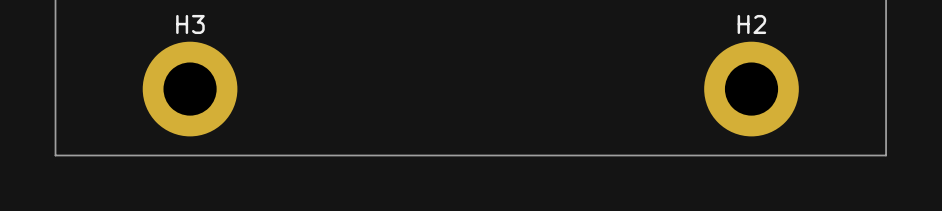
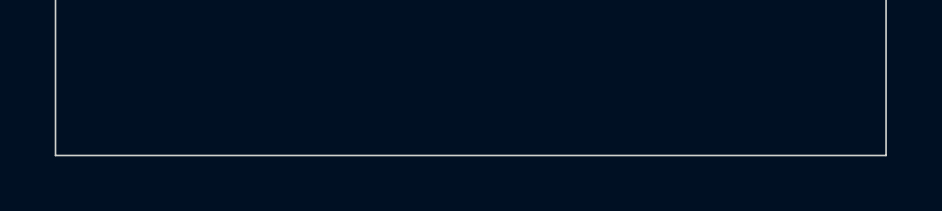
H3: (190, 89) -> none
H2: (751, 89) -> none

